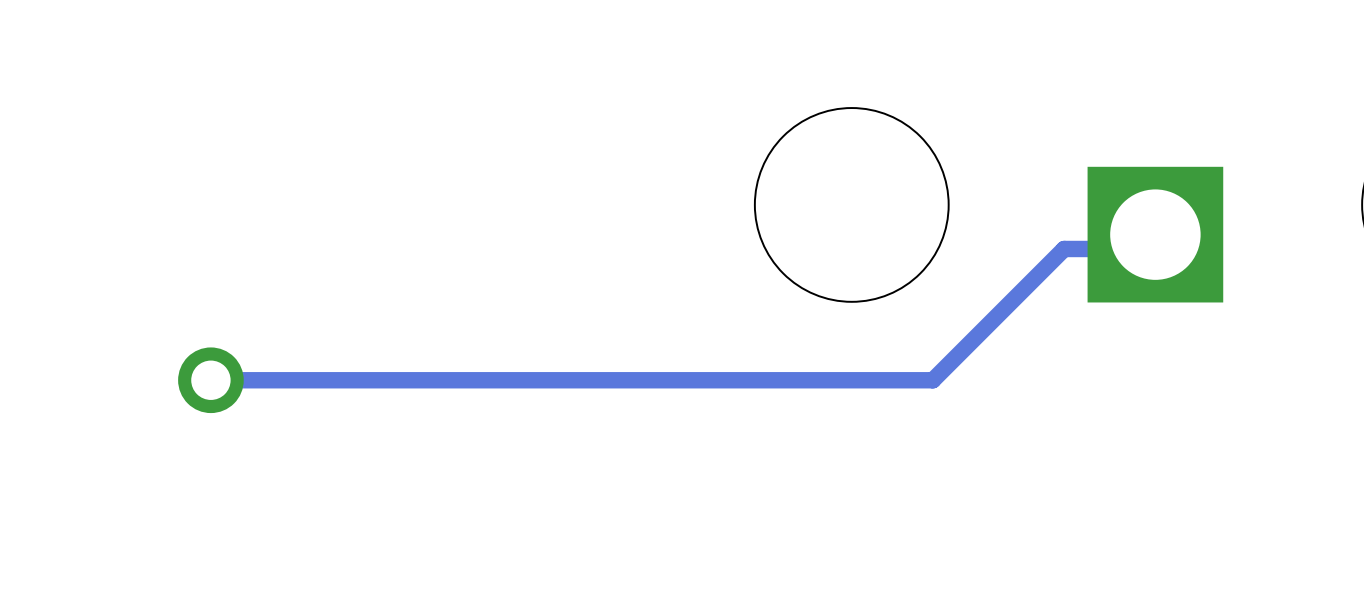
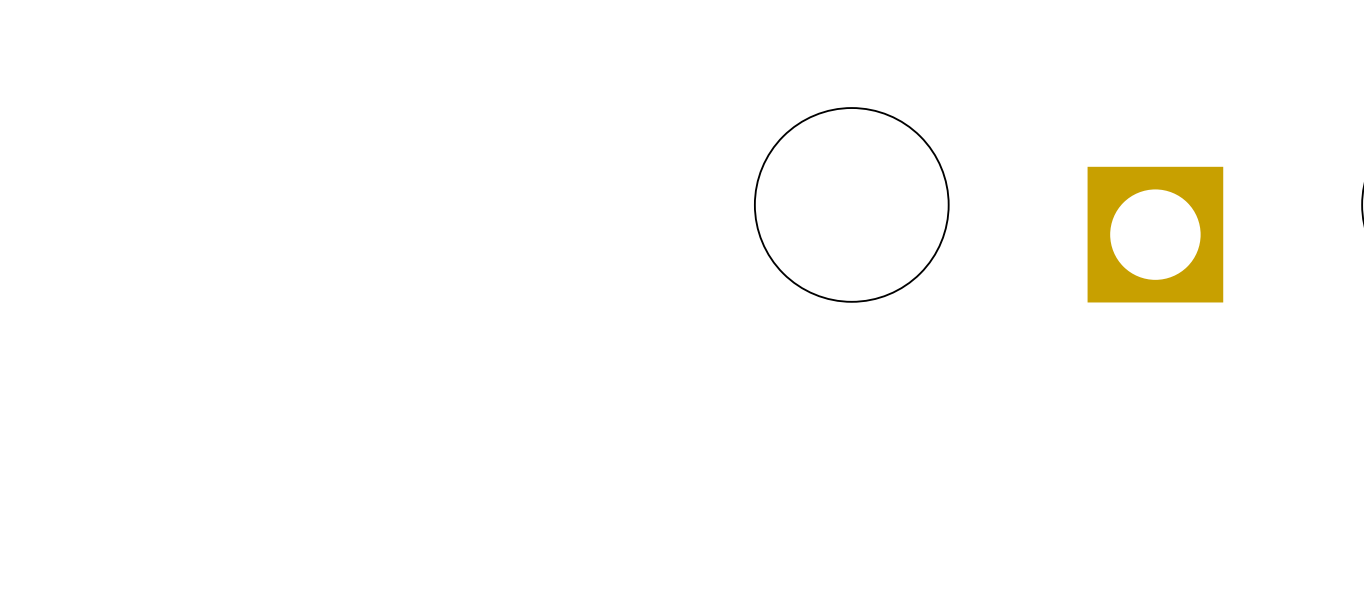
track: (1155, 234) (1146, 248) (1064, 248) (932, 380) (210, 380) -> none
via: (210, 380) -> none

